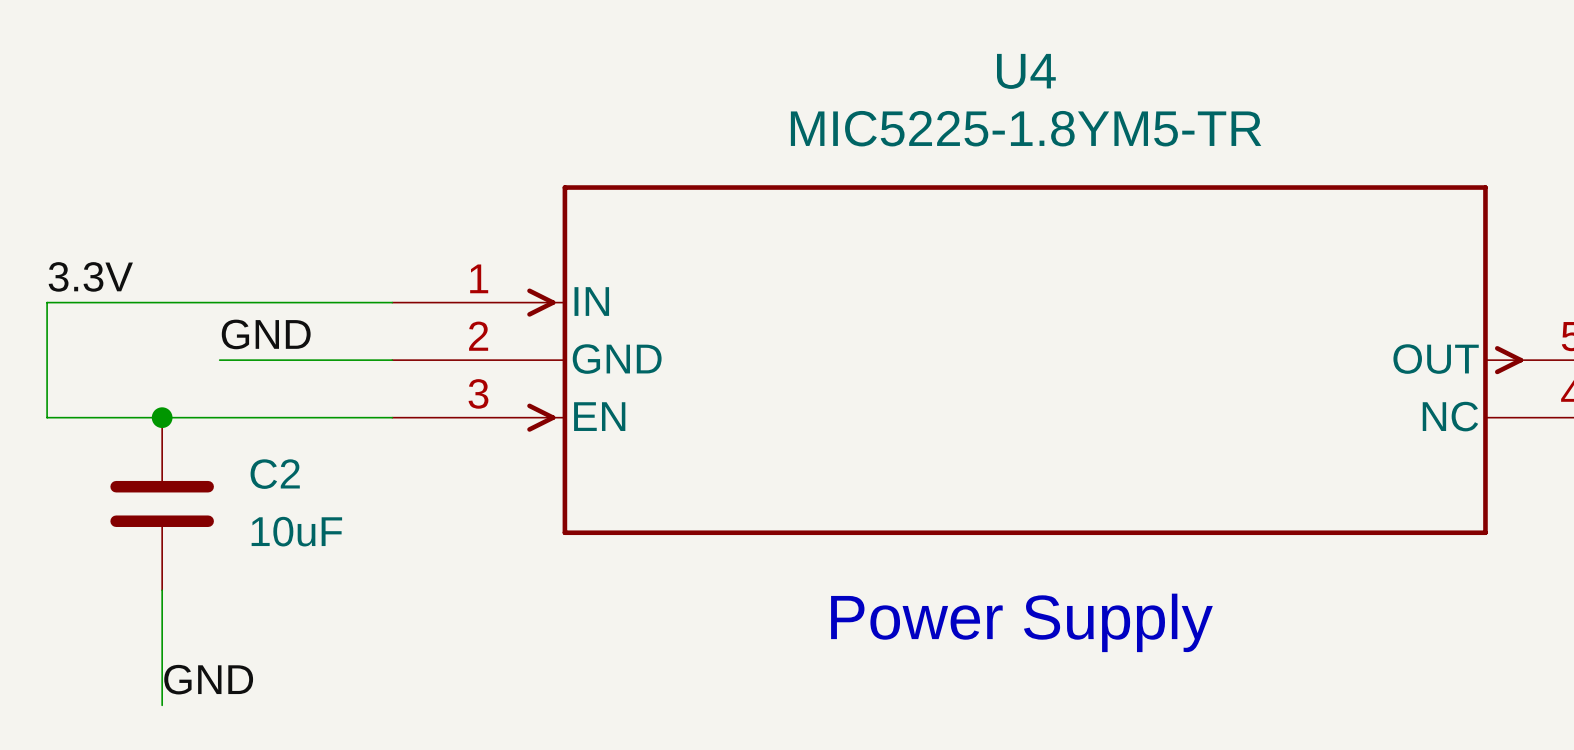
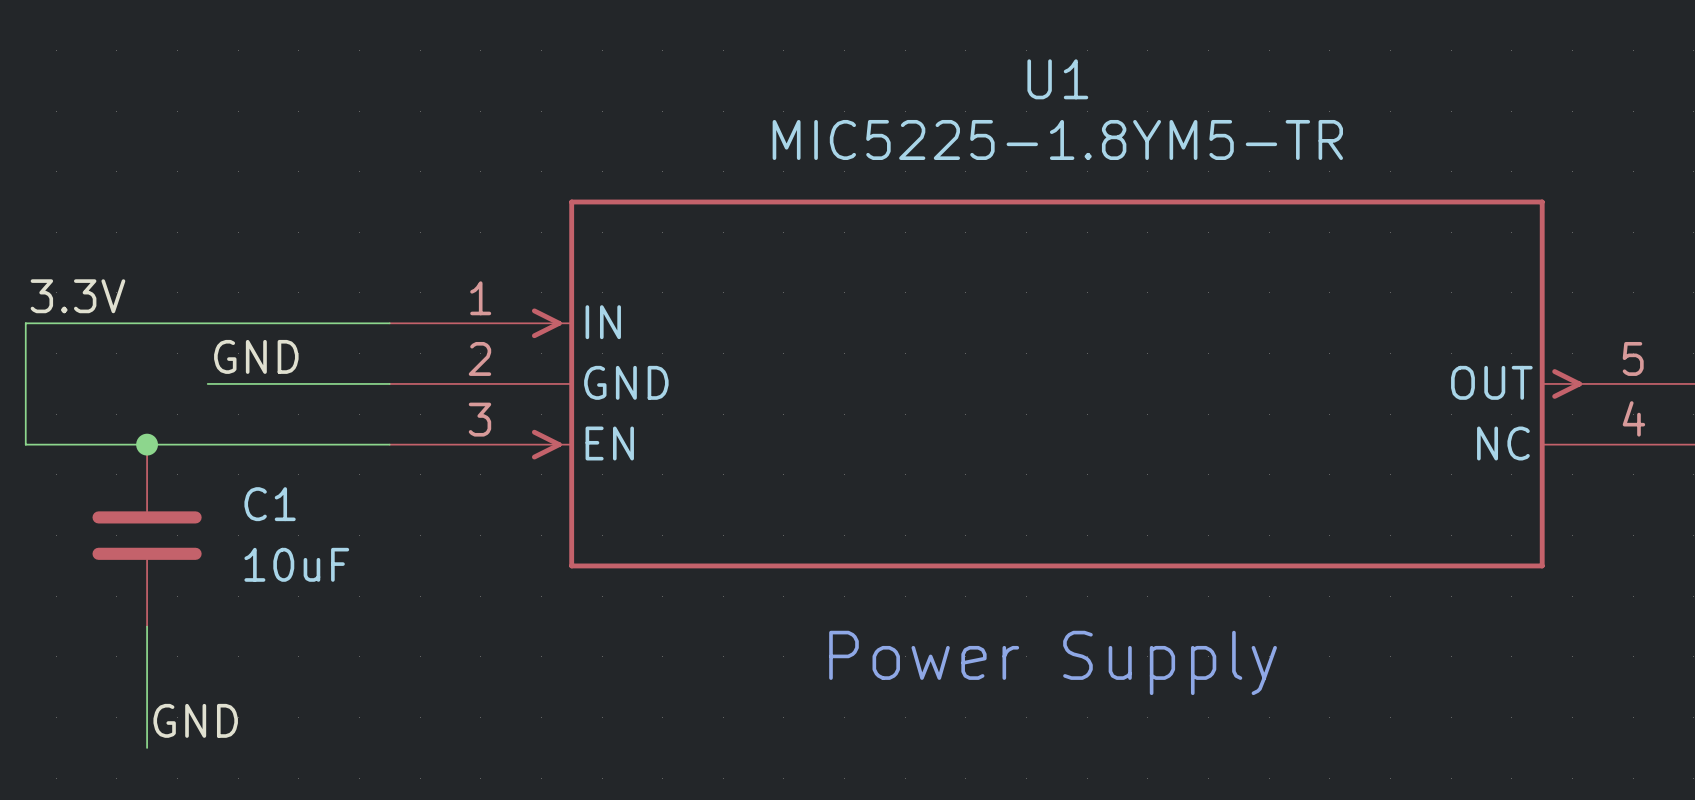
U4 name: U4 (1026, 71) -> U1 (1057, 79)
C2 name: C2 (275, 474) -> C1 (270, 504)

